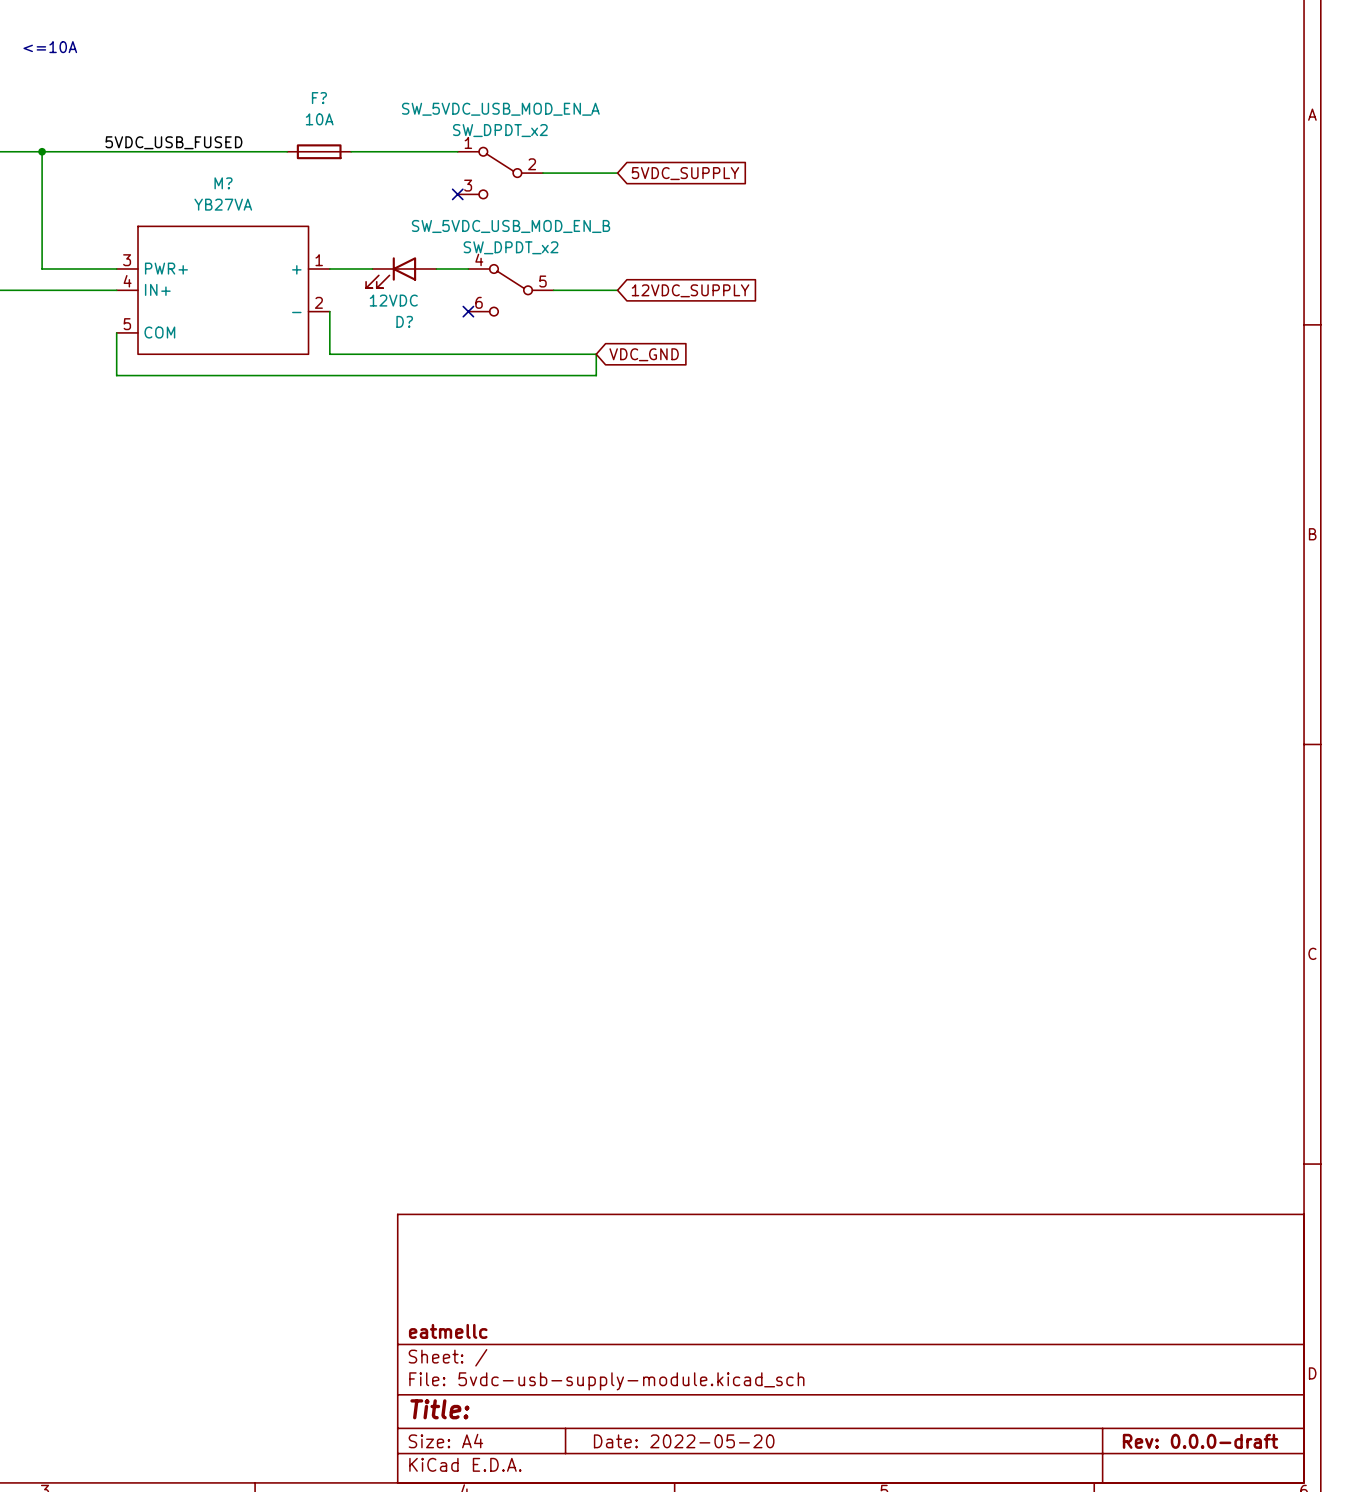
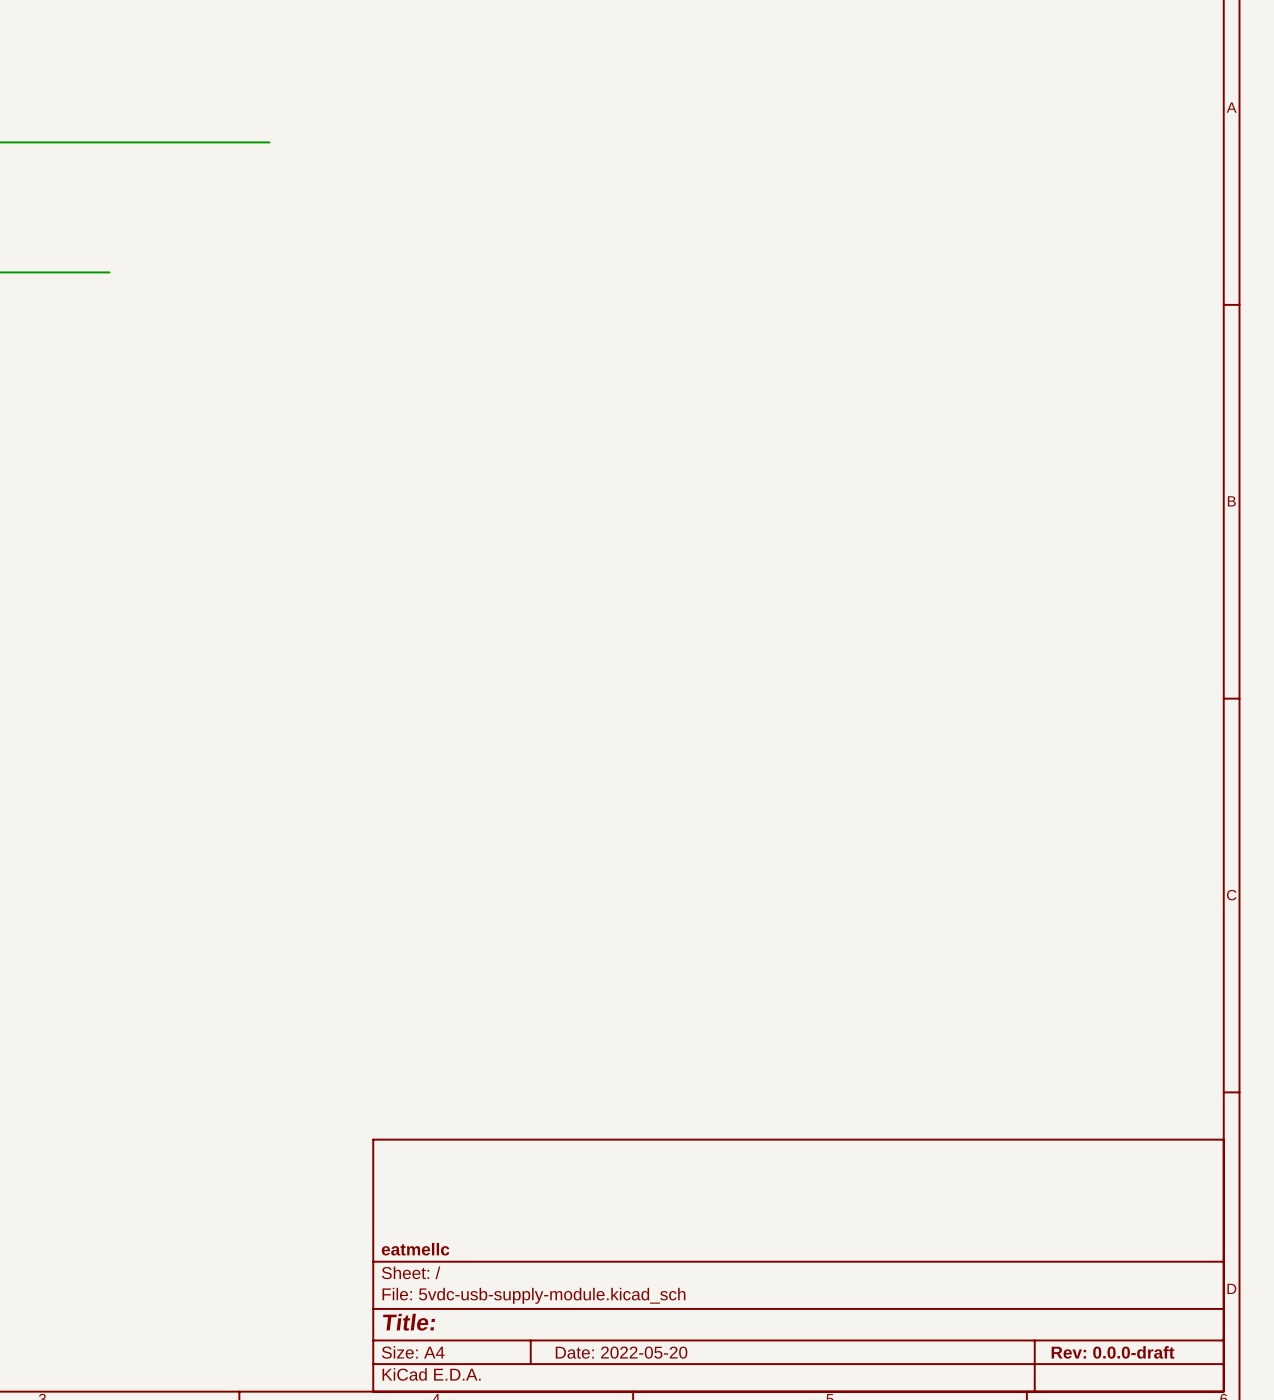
text: <=10A (50, 47) -> none
label: 5VDC_USB_FUSED (173, 142) -> none
wire: (42, 151) (42, 268) (116, 268) -> none
junction: (42, 151) -> none
F?: 10A (319, 151) -> none
wire: (351, 151) (457, 151) -> none
SW_5VDC_USB_MOD_EN_A: SW_DPDT_x2 (500, 173) -> none
wire: (542, 173) (617, 173) -> none
global label: 5VDC_SUPPLY (685, 173) -> none
no-connect mark: (457, 194) -> none
wire: (329, 268) (372, 268) -> none
wire: (436, 268) (468, 268) -> none
D?: 12VDC (401, 272) -> none
M?: YB27VA (223, 290) -> none
SW_5VDC_USB_MOD_EN_B: SW_DPDT_x2 (511, 290) -> none
wire: (553, 290) (617, 290) -> none
global label: 12VDC_SUPPLY (690, 290) -> none
wire: (329, 311) (329, 354) (596, 354) (596, 375) (116, 375) (116, 332) -> none
no-connect mark: (468, 311) -> none
global label: VDC_GND (644, 354) -> none

